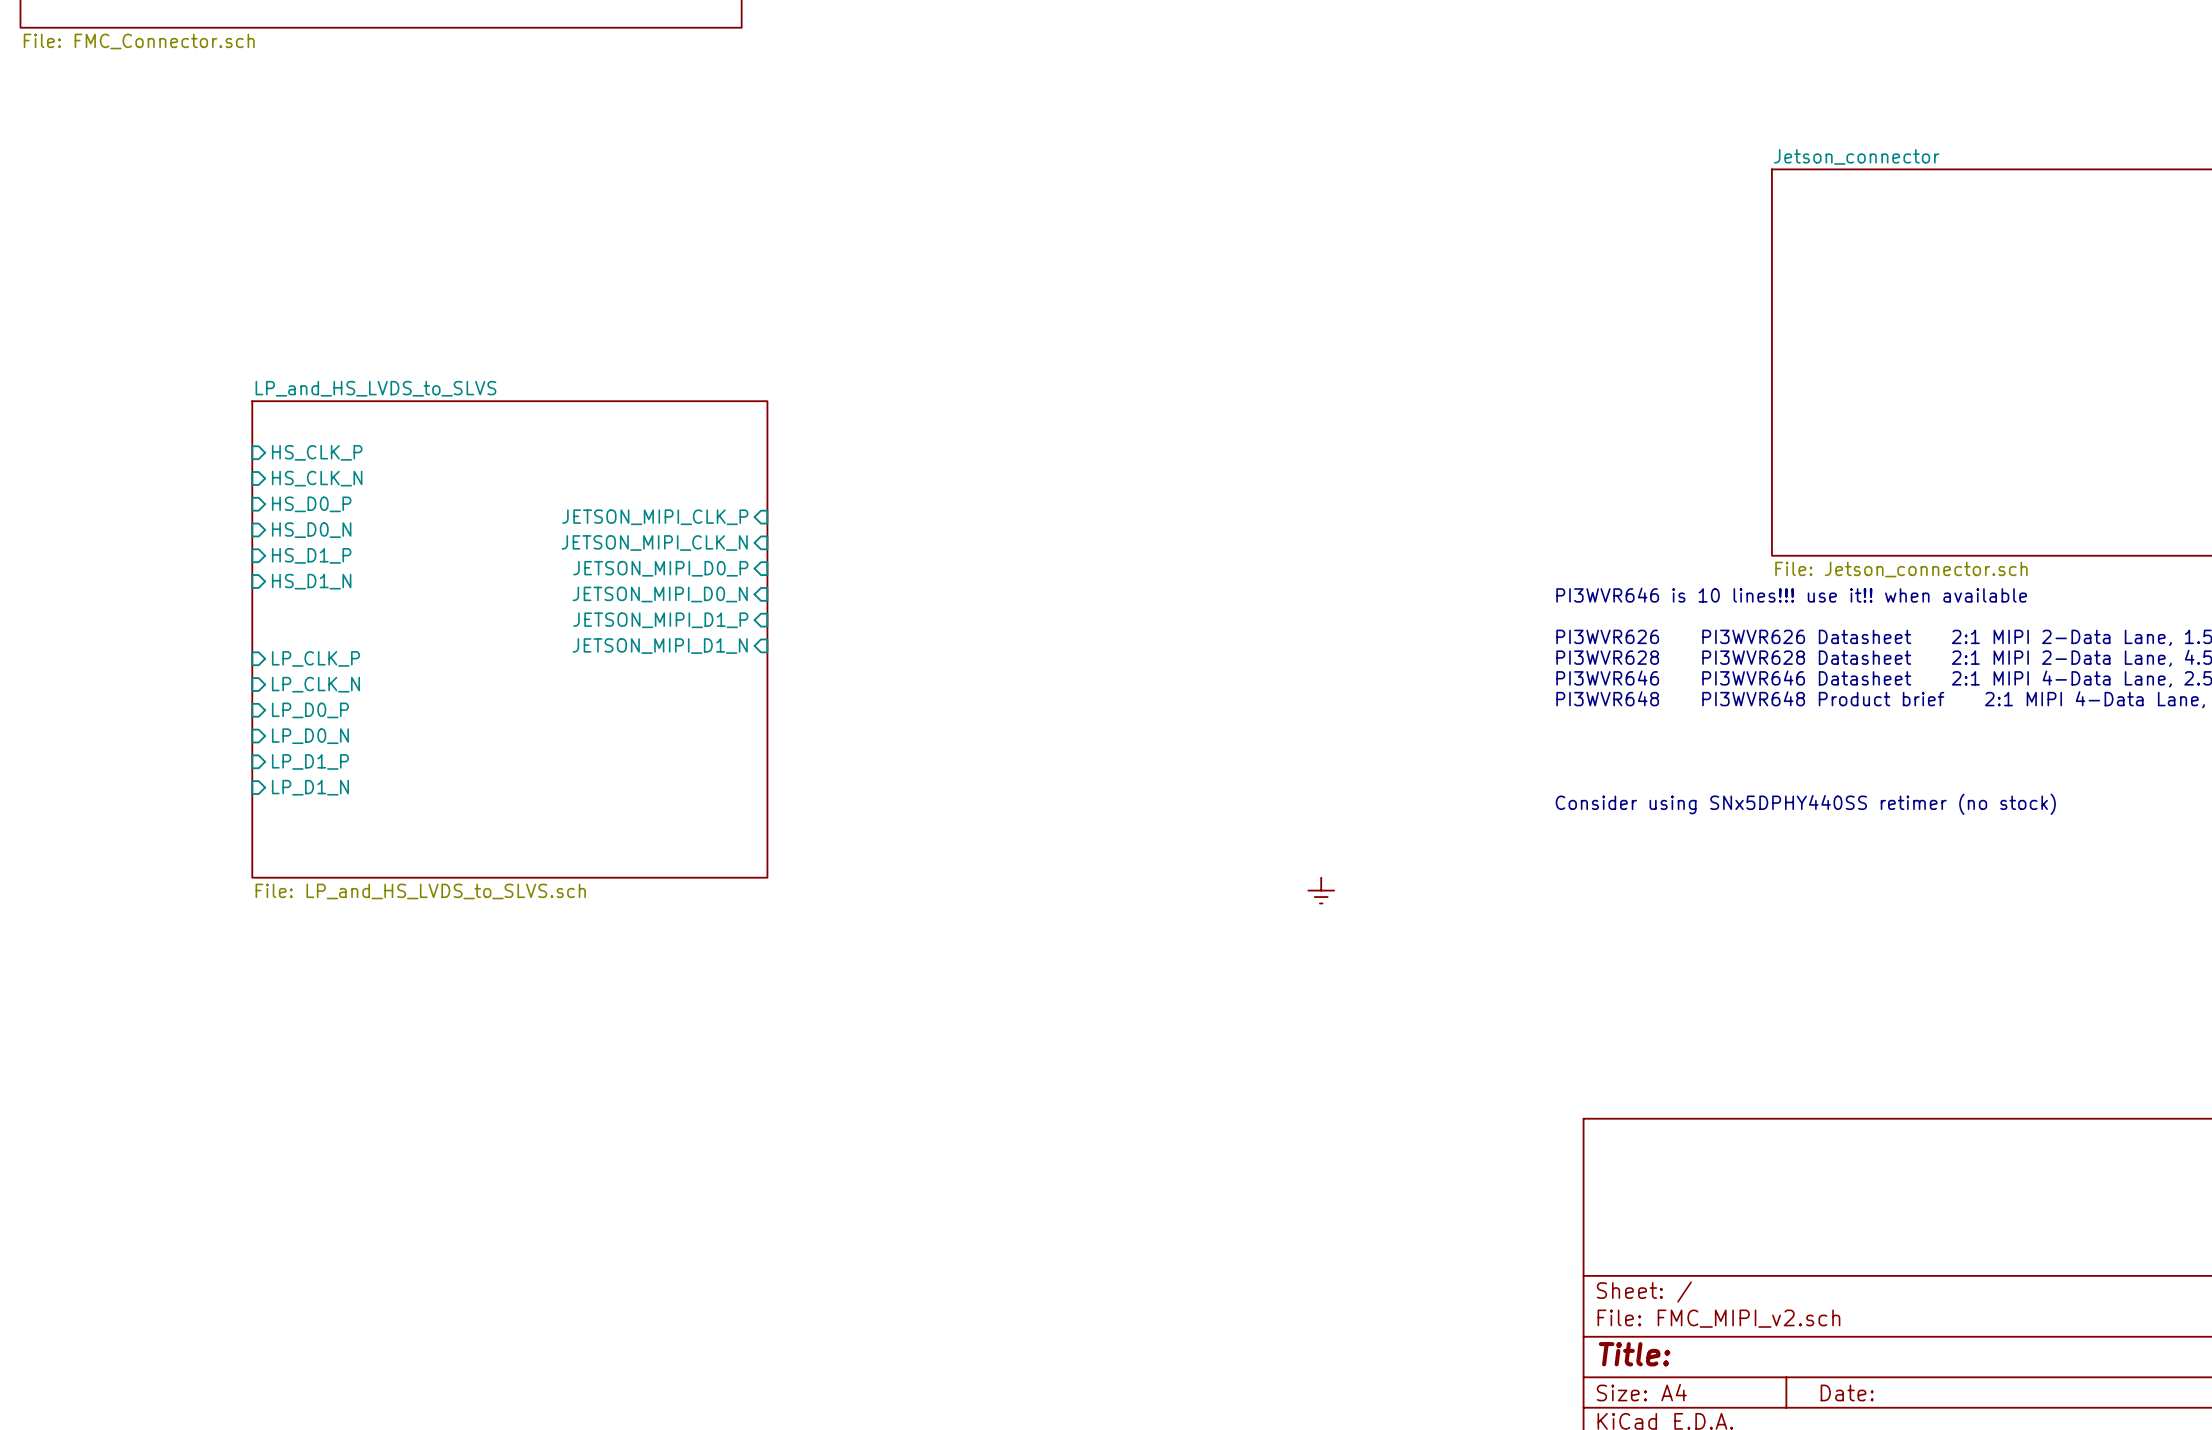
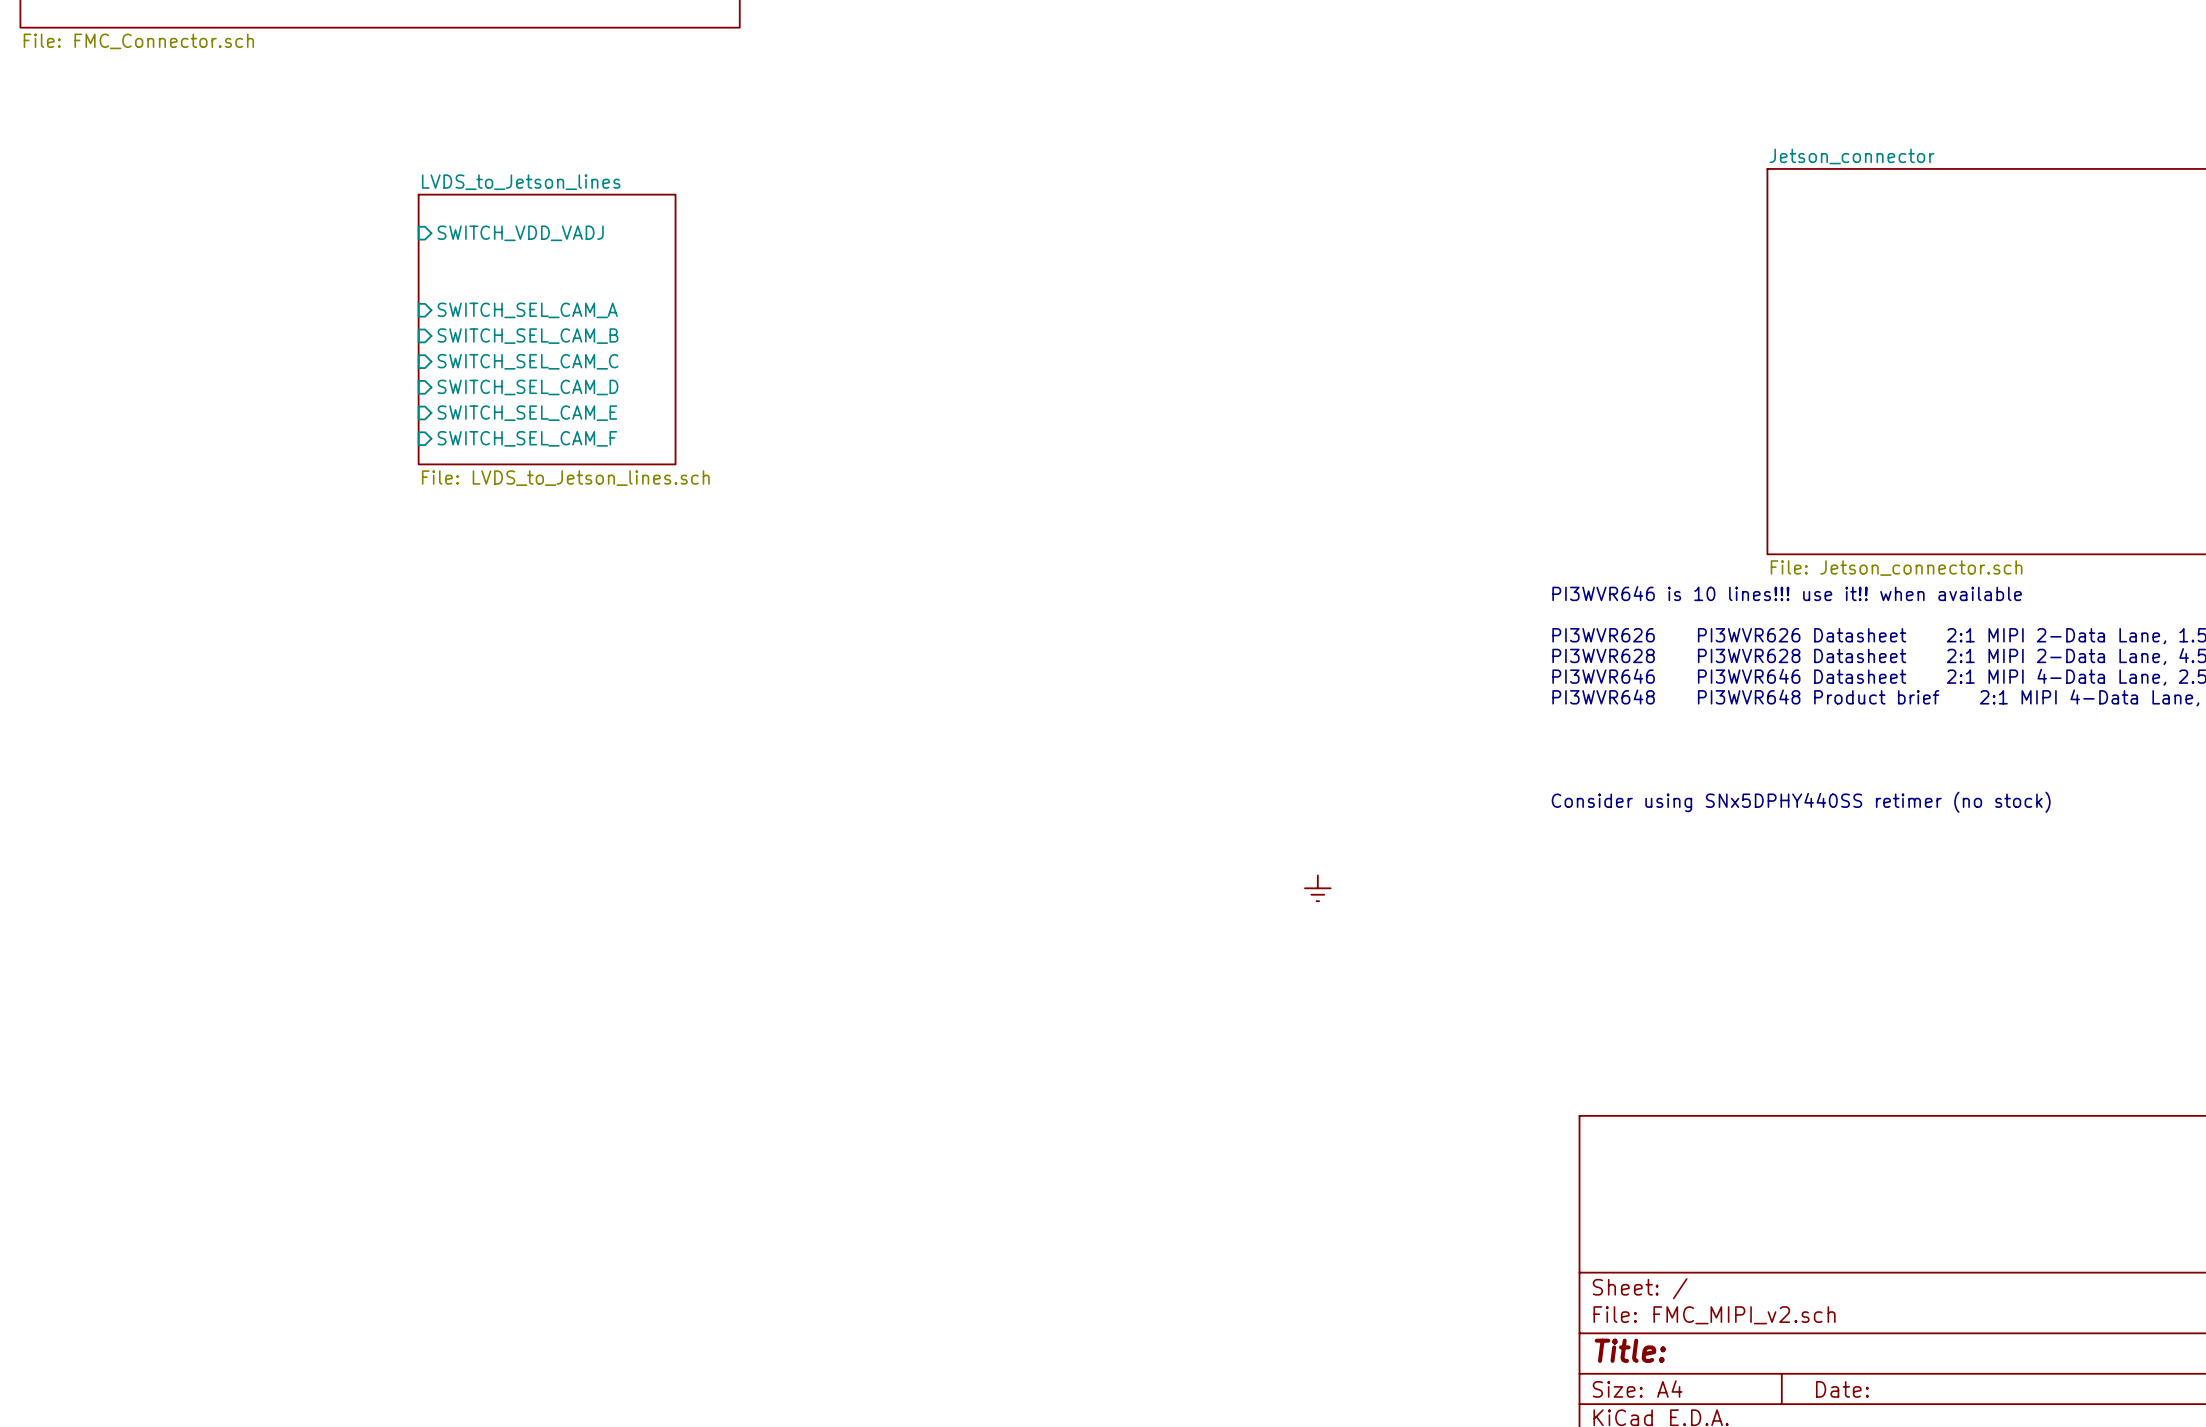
sheet pin: none -> SWITCH_VDD_VADJ (520, 233)
sheet pin: none -> SWITCH_SEL_CAM_A (527, 310)
sheet LVDS_to_Jetson_lines: none -> File: LVDS_to_Jetson_lines.sch (547, 329)
sheet pin: none -> SWITCH_SEL_CAM_B (528, 336)
sheet pin: none -> SWITCH_SEL_CAM_C (528, 361)
sheet pin: none -> SWITCH_SEL_CAM_D (528, 387)
sheet pin: none -> SWITCH_SEL_CAM_E (527, 413)
sheet pin: none -> SWITCH_SEL_CAM_F (527, 438)
sheet pin: HS_CLK_P (317, 452) -> none
sheet pin: HS_CLK_N (317, 478) -> none
sheet pin: HS_D0_P (311, 504) -> none
sheet pin: JETSON_MIPI_CLK_P (655, 517) -> none
sheet pin: HS_D0_N (311, 530) -> none
sheet pin: JETSON_MIPI_CLK_N (654, 543) -> none
sheet pin: HS_D1_P (311, 555) -> none
sheet pin: JETSON_MIPI_D0_P (660, 568) -> none
sheet pin: HS_D1_N (311, 581) -> none
sheet pin: JETSON_MIPI_D0_N (660, 594) -> none
sheet pin: JETSON_MIPI_D1_P (660, 620) -> none
sheet LP_and_HS_LVDS_to_SLVS: File: LP_and_HS_LVDS_to_SLVS.sch (509, 639) -> none
sheet pin: JETSON_MIPI_D1_N (660, 646) -> none
sheet pin: LP_CLK_P (315, 658) -> none
sheet pin: LP_CLK_N (315, 684) -> none
sheet pin: LP_D0_P (310, 710) -> none
sheet pin: LP_D0_N (310, 736) -> none
sheet pin: LP_D1_P (310, 761) -> none
sheet pin: LP_D1_N (310, 787) -> none

